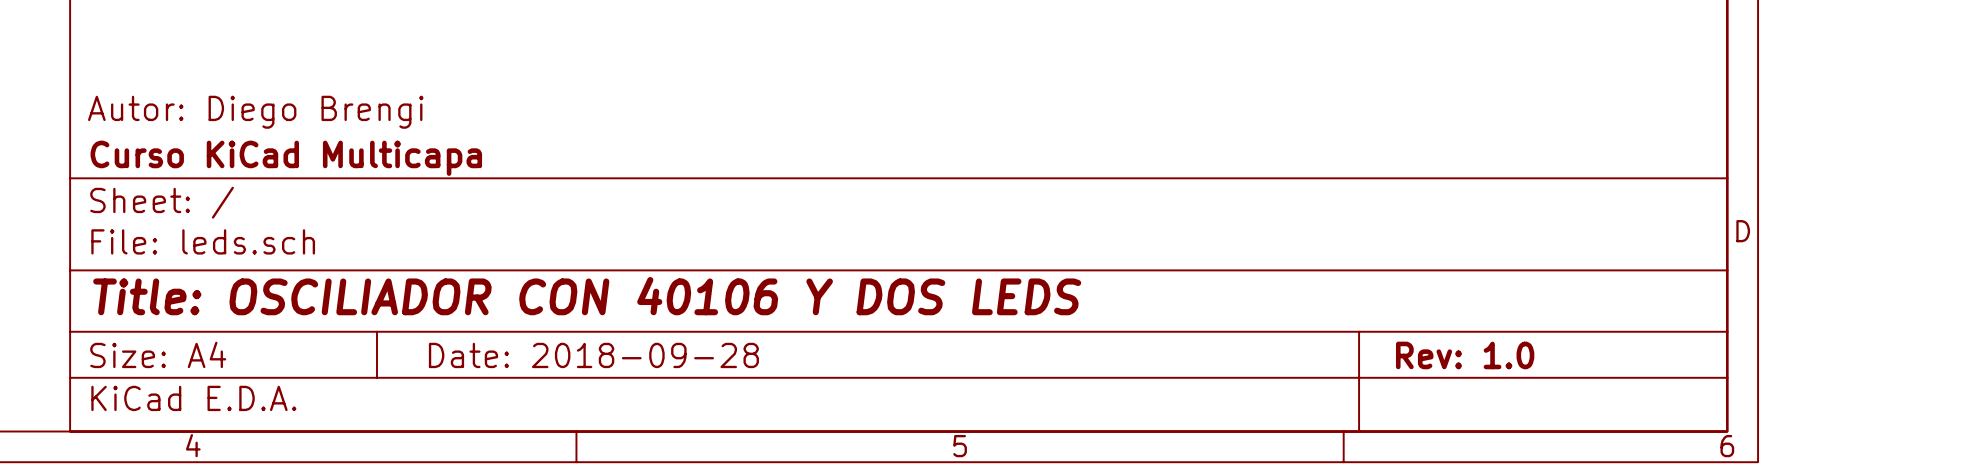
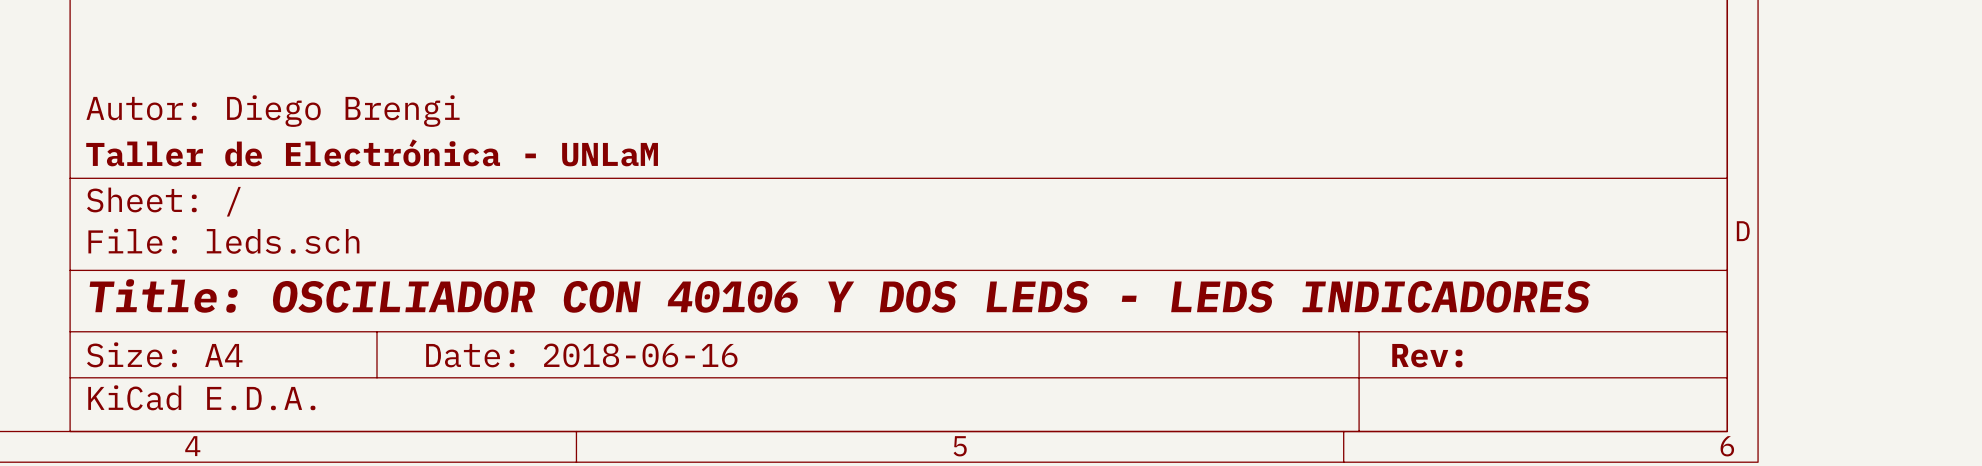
title block: Curso KiCad Multicapa (286, 158) -> Taller de Electrónica - UNLaM (372, 152)
title block: Title: OSCILIADOR CON 40106 Y DOS LEDS (587, 296) -> Title: OSCILIADOR CON 40106 Y DOS LEDS - LEDS INDICADORES (839, 295)
title block: Date: 2018-09-28 (593, 355) -> Date: 2018-06-16 (581, 355)
title block: Rev: 1.0 (1465, 355) -> Rev: (1427, 355)

